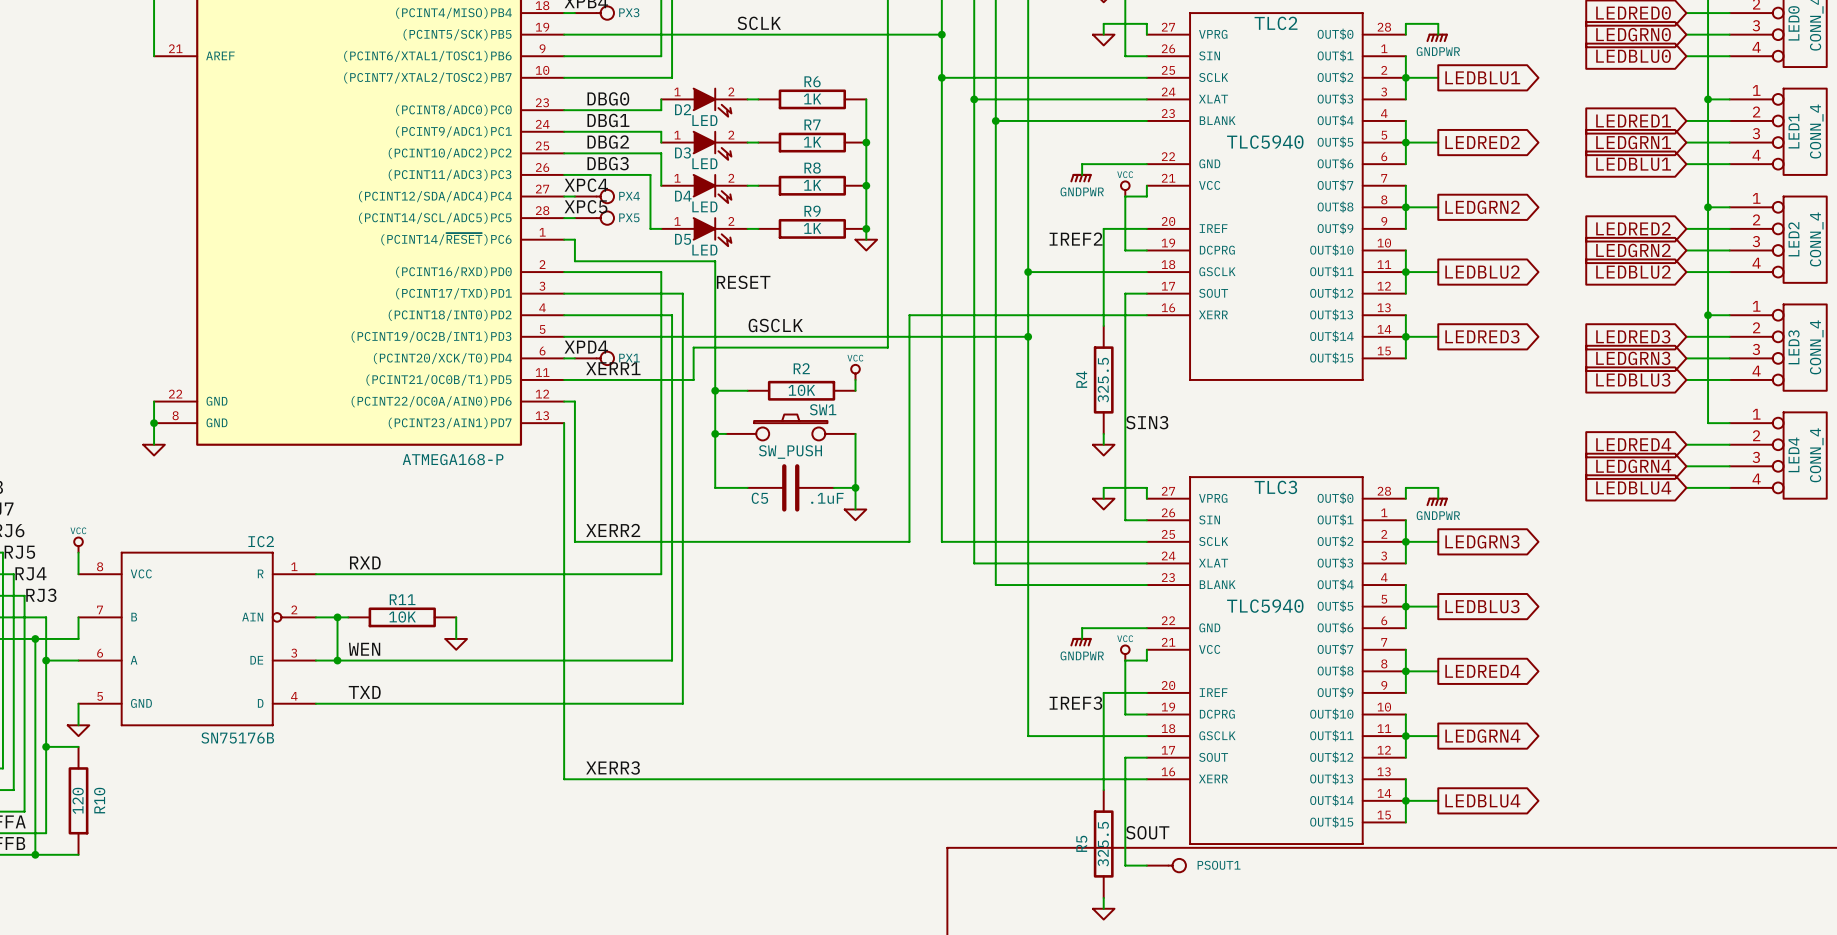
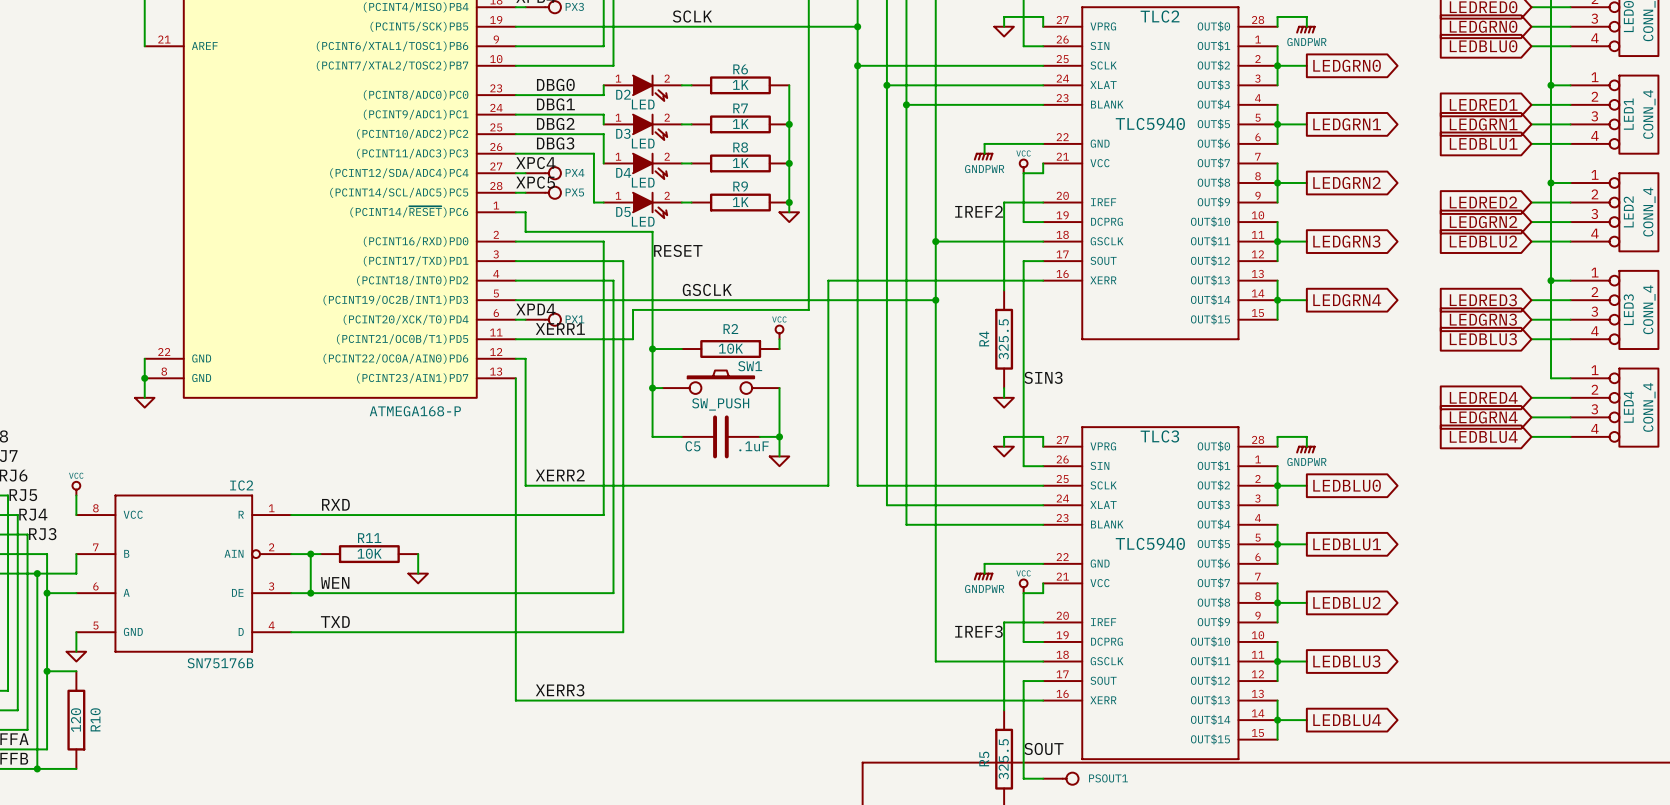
global label: LEDBLU1 (1482, 77) -> LEDGRN0 (1347, 65)
global label: LEDRED2 (1482, 142) -> LEDGRN1 (1347, 124)
global label: LEDBLU2 (1482, 272) -> LEDGRN3 (1346, 241)
global label: LEDRED3 (1482, 336) -> LEDGRN4 (1347, 300)
global label: LEDGRN3 (1482, 541) -> LEDBLU0 (1347, 485)
global label: LEDBLU3 (1482, 606) -> LEDBLU1 (1347, 544)
global label: LEDRED4 (1482, 671) -> LEDBLU2 (1346, 602)
global label: LEDGRN4 (1482, 736) -> LEDBLU3 (1346, 661)

